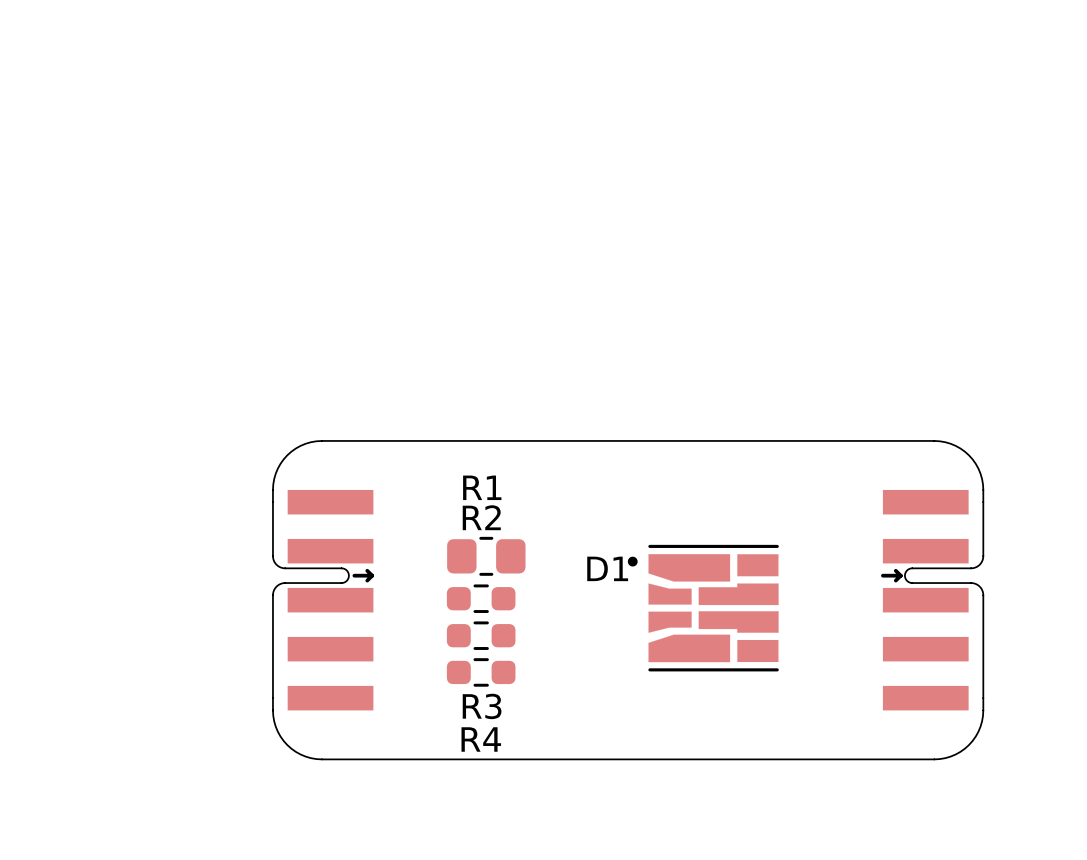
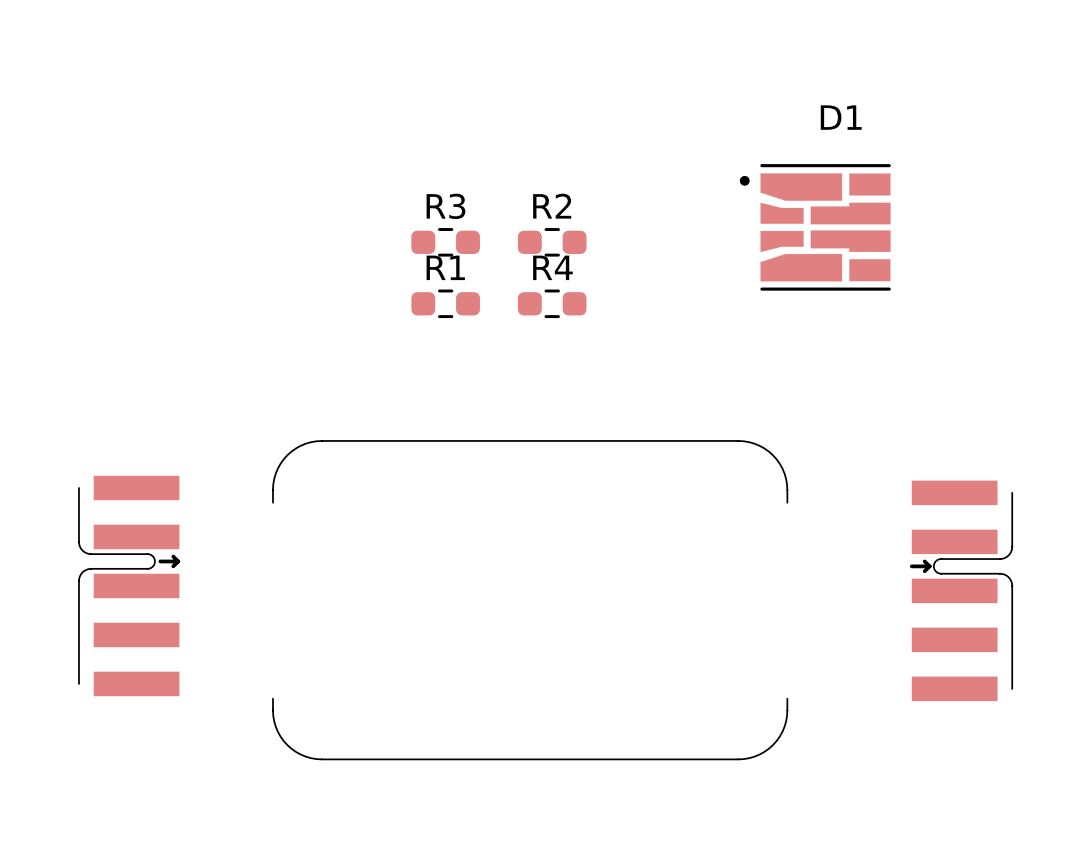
board edge: (738, 440) (945, 442) (960, 448) (975, 463) (982, 479) (983, 502) -> (738, 440) (759, 445) (776, 459) (786, 479) (787, 502)
R2 name position: R2 (481, 517) -> R2 (552, 206)
R1 footprint: [447, 536, 526, 576] -> [411, 289, 480, 319]
D1 name position: D1 (607, 568) -> D1 (841, 117)
R2 position: (481, 598) -> (552, 242)
part position: (323, 600) -> (129, 585)
part position: (932, 600) -> (961, 590)
D1 position: (703, 608) -> (815, 227)
R3 position: (481, 635) -> (445, 242)
R4 position: (481, 672) -> (552, 303)
board edge: (983, 698) (982, 721) (975, 736) (964, 748) (945, 758) (738, 759) -> (787, 698) (786, 721) (776, 740) (759, 754) (738, 759)
R3 name position: R3 (482, 706) -> R3 (445, 206)
R4 name position: R4 (481, 739) -> R4 (552, 267)

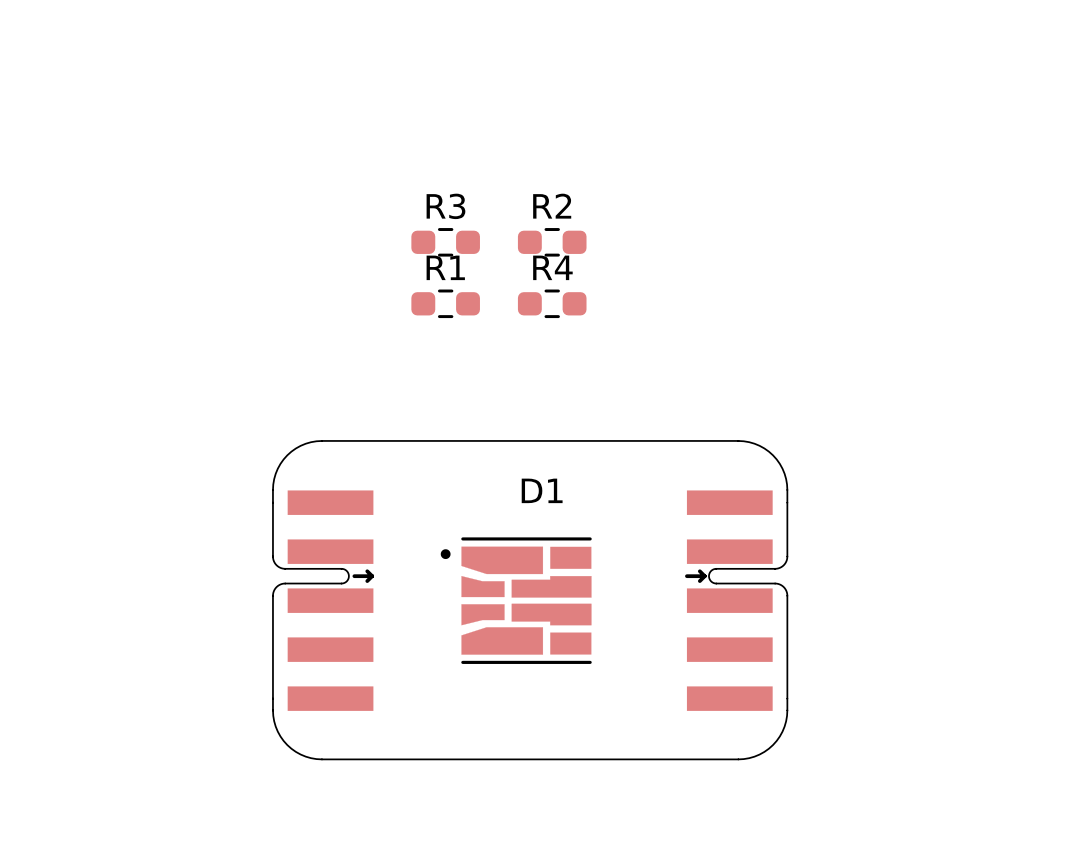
D1 position: (815, 227) -> (516, 600)
part position: (129, 585) -> (323, 600)
part position: (961, 590) -> (736, 600)

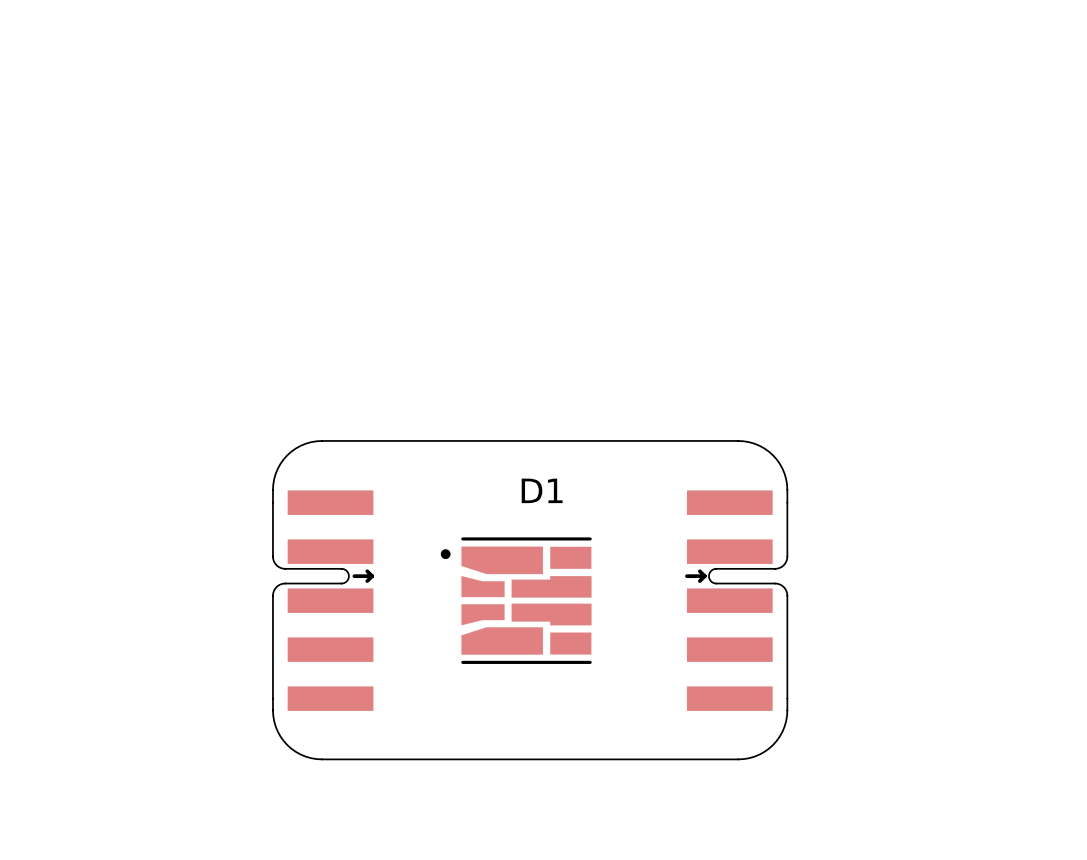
R3: (445, 242) -> none
R2: (552, 242) -> none
R1: (445, 303) -> none
R4: (552, 303) -> none

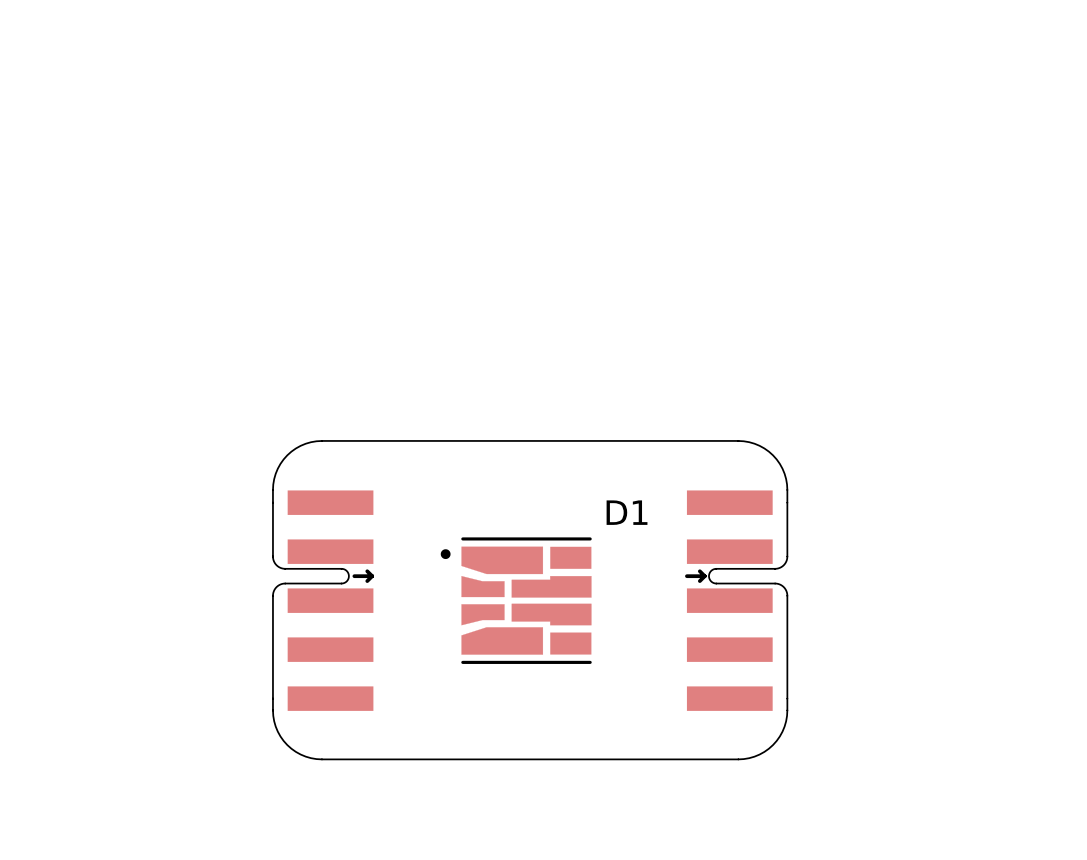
D1 name position: D1 (542, 490) -> D1 (627, 512)

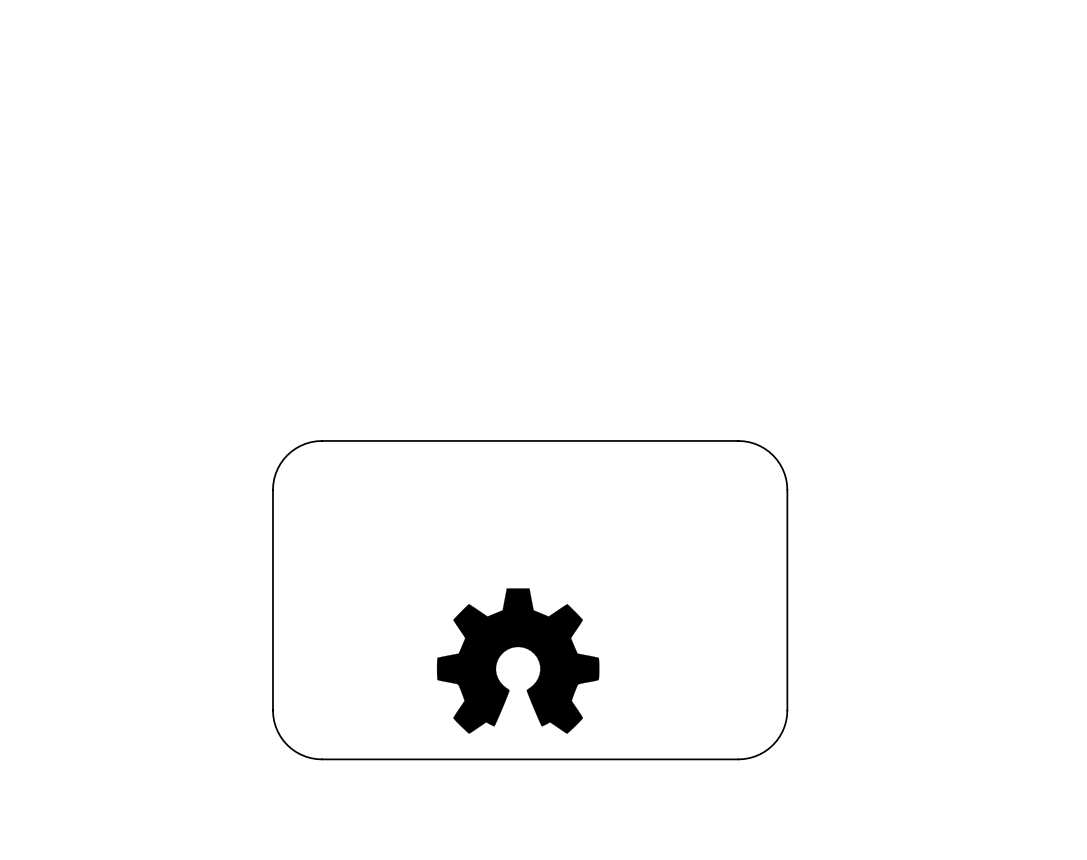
board edge: none -> (272, 502) (272, 698)
board edge: none -> (787, 502) (787, 698)
drawing: none -> [436, 588, 600, 734]
part: (323, 600) -> none
D1: (516, 600) -> none
part: (736, 600) -> none

